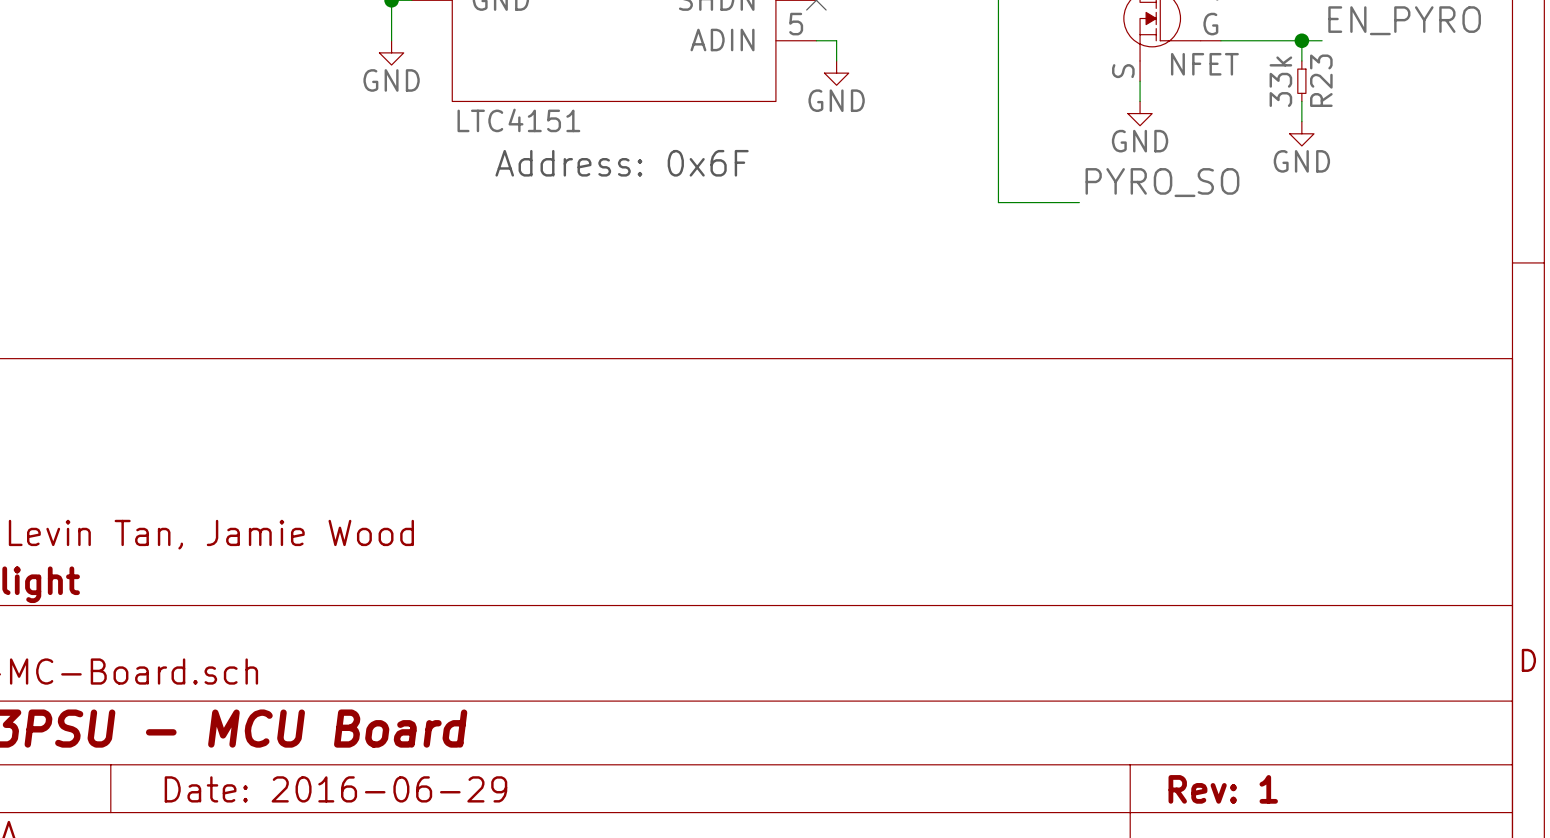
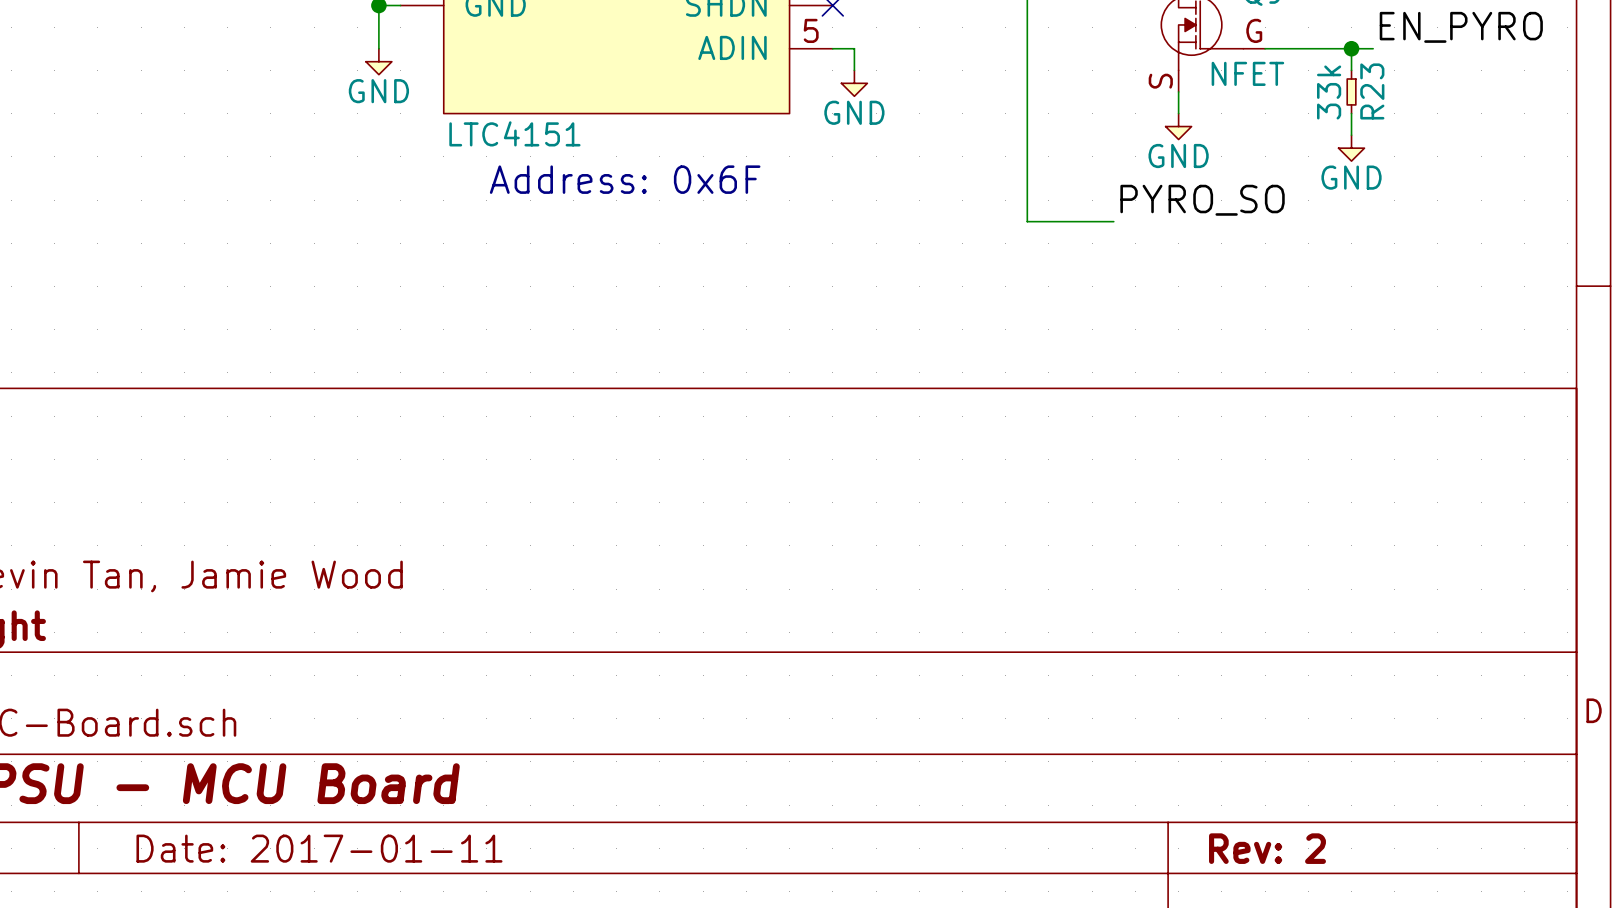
title block: Date: 2016-06-29 (335, 789) -> Date: 2017-01-11 (319, 848)
title block: Rev: 1 (1223, 789) -> Rev: 2 (1267, 848)

